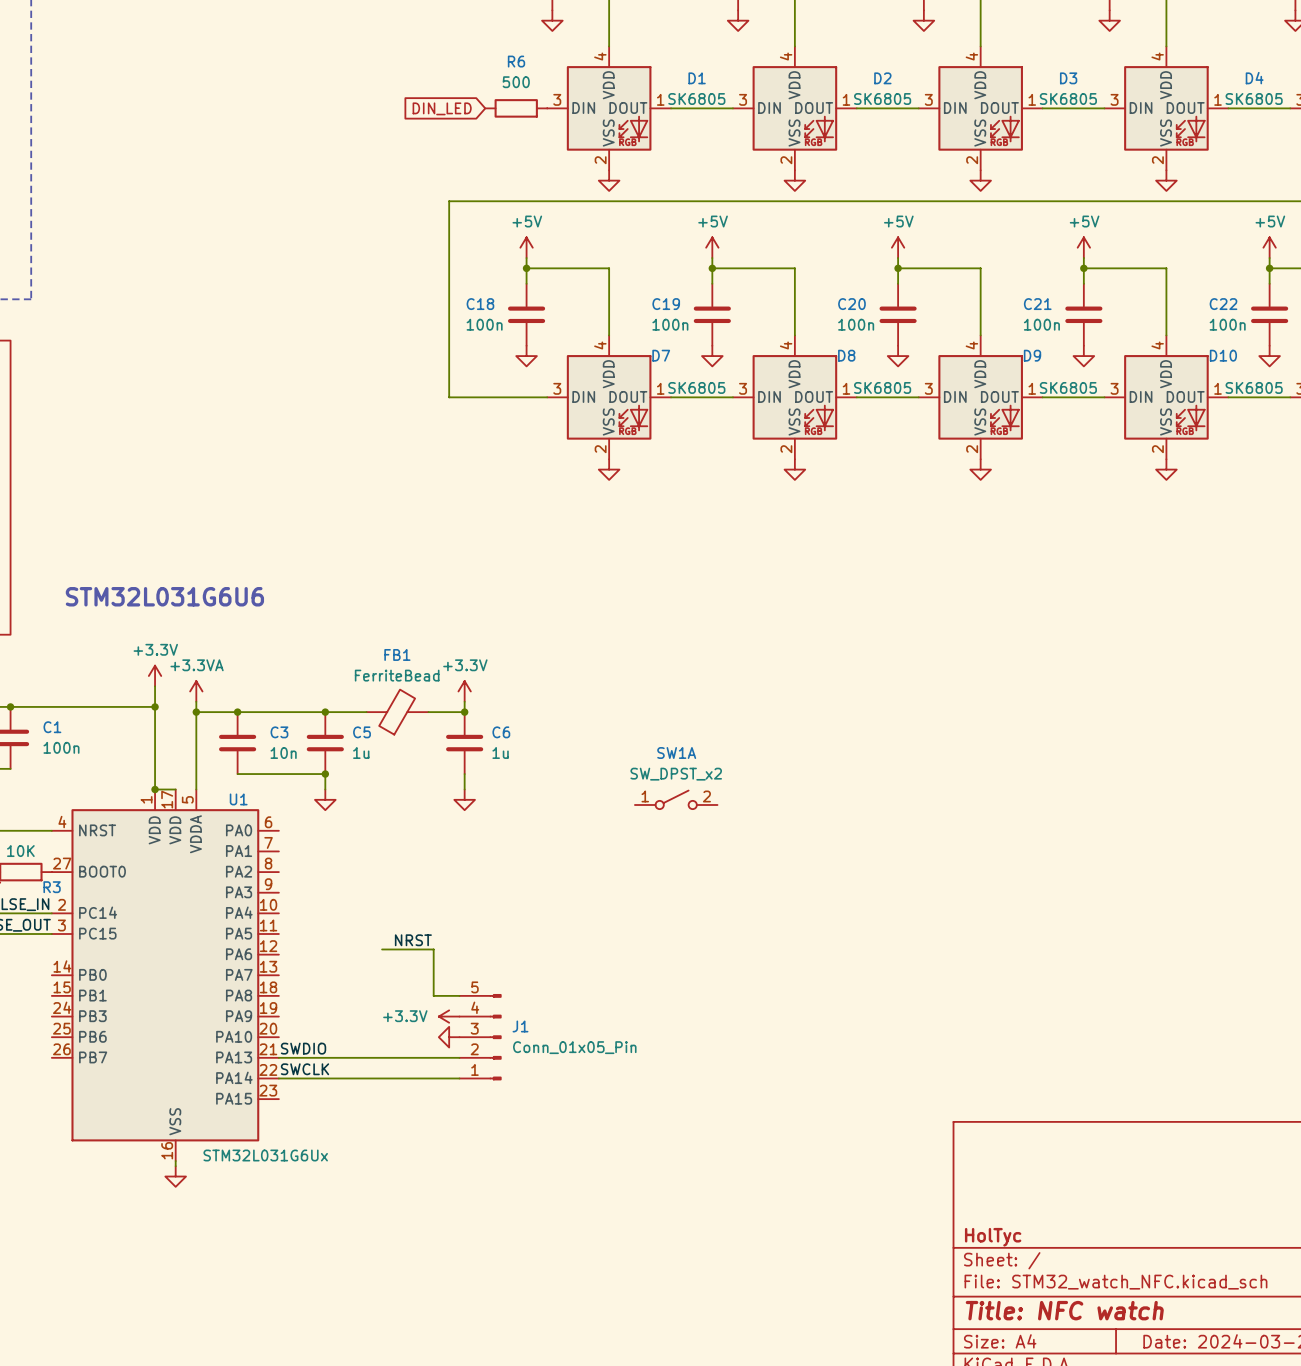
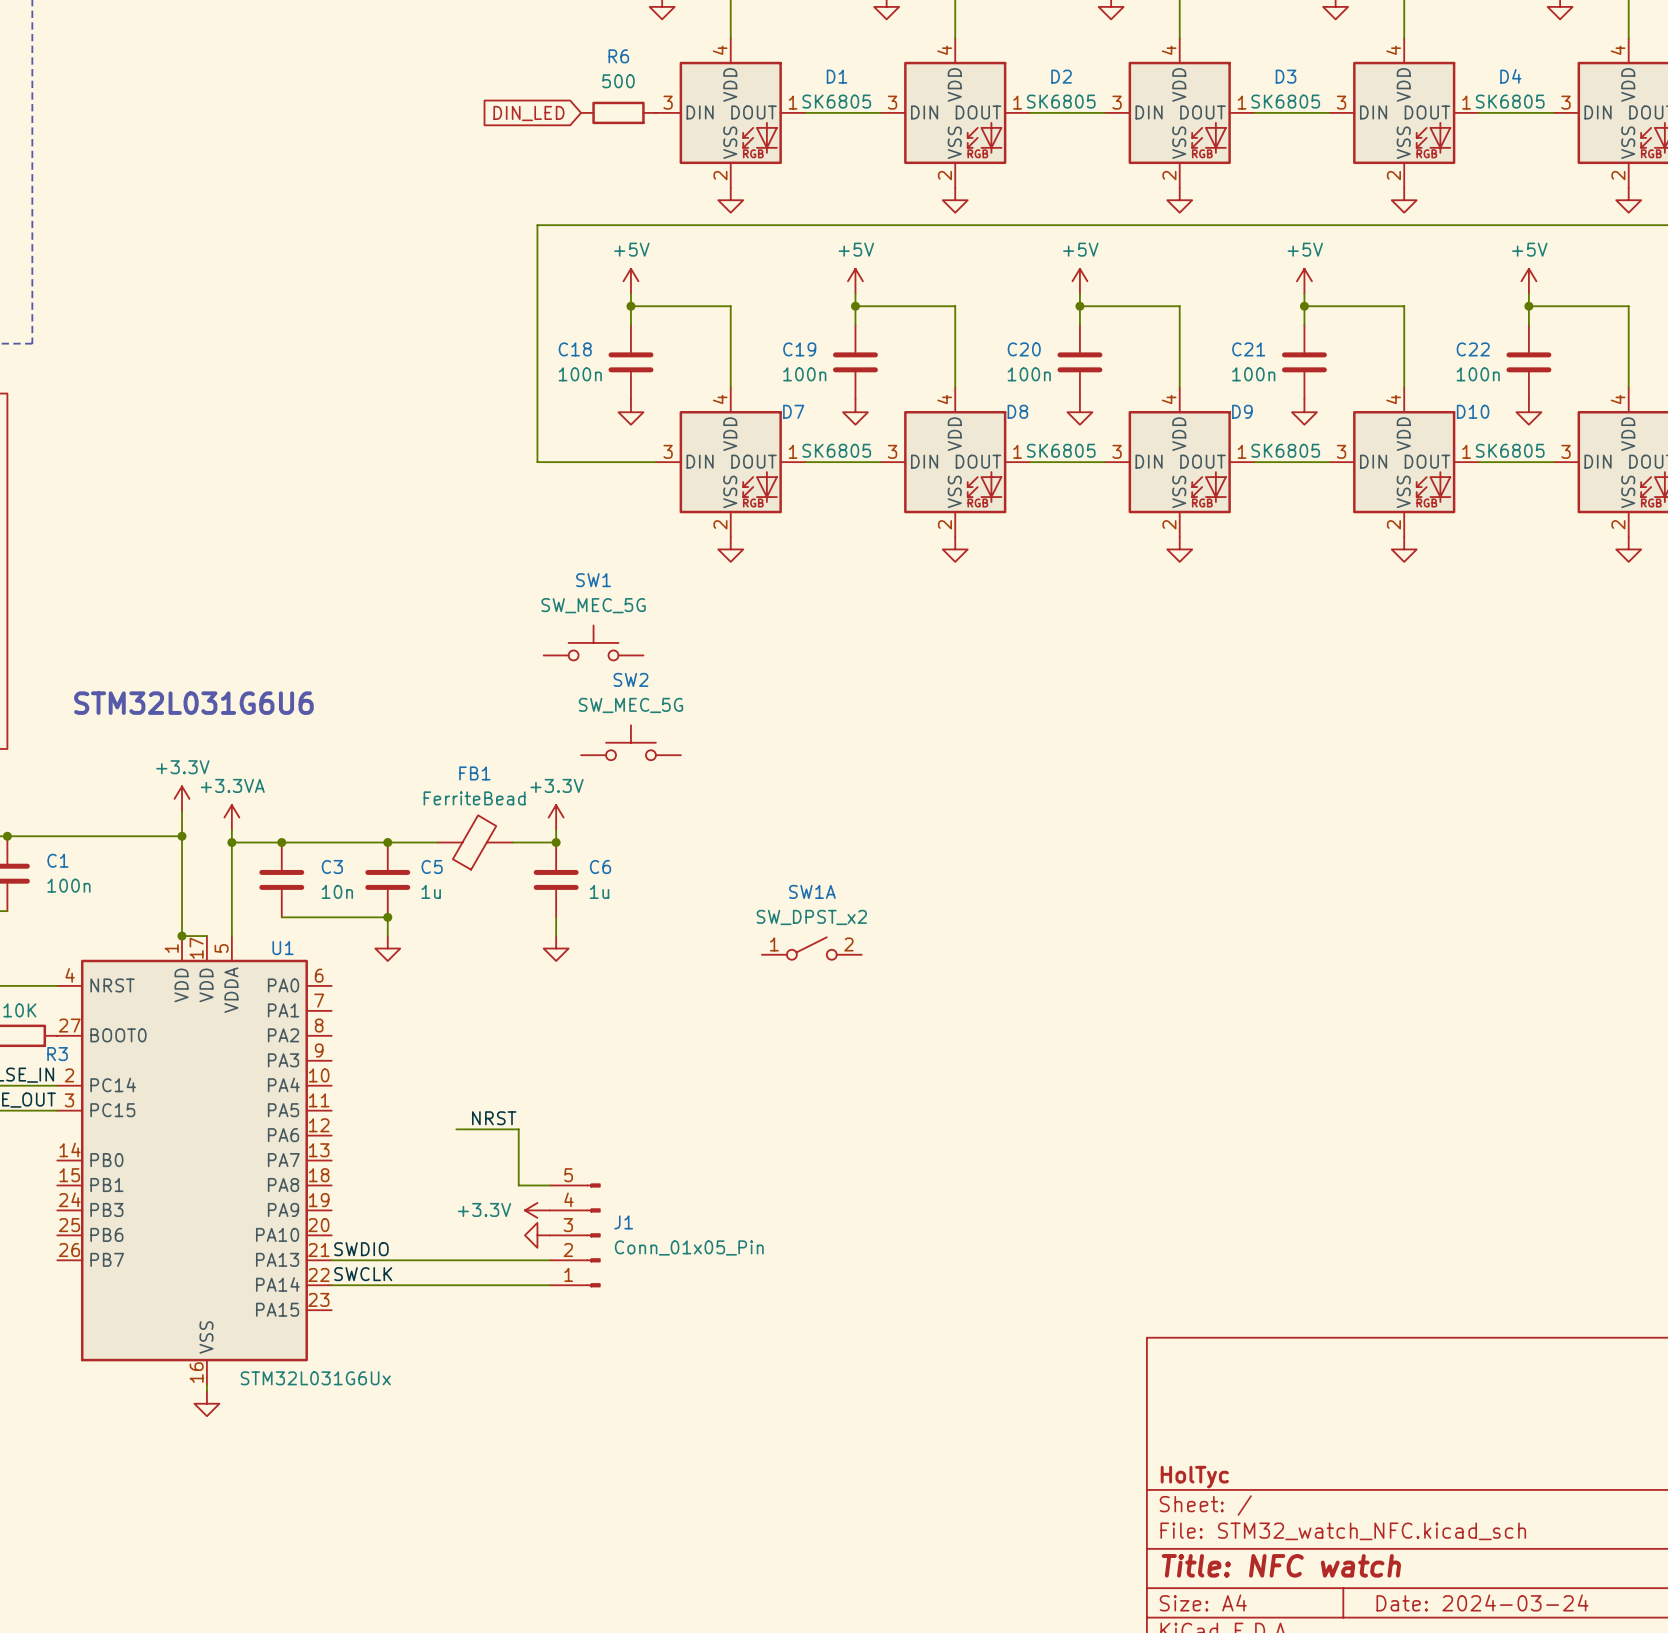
SW1: none -> SW_MEC_5G (593, 642)
SW2: none -> SW_MEC_5G (630, 742)

